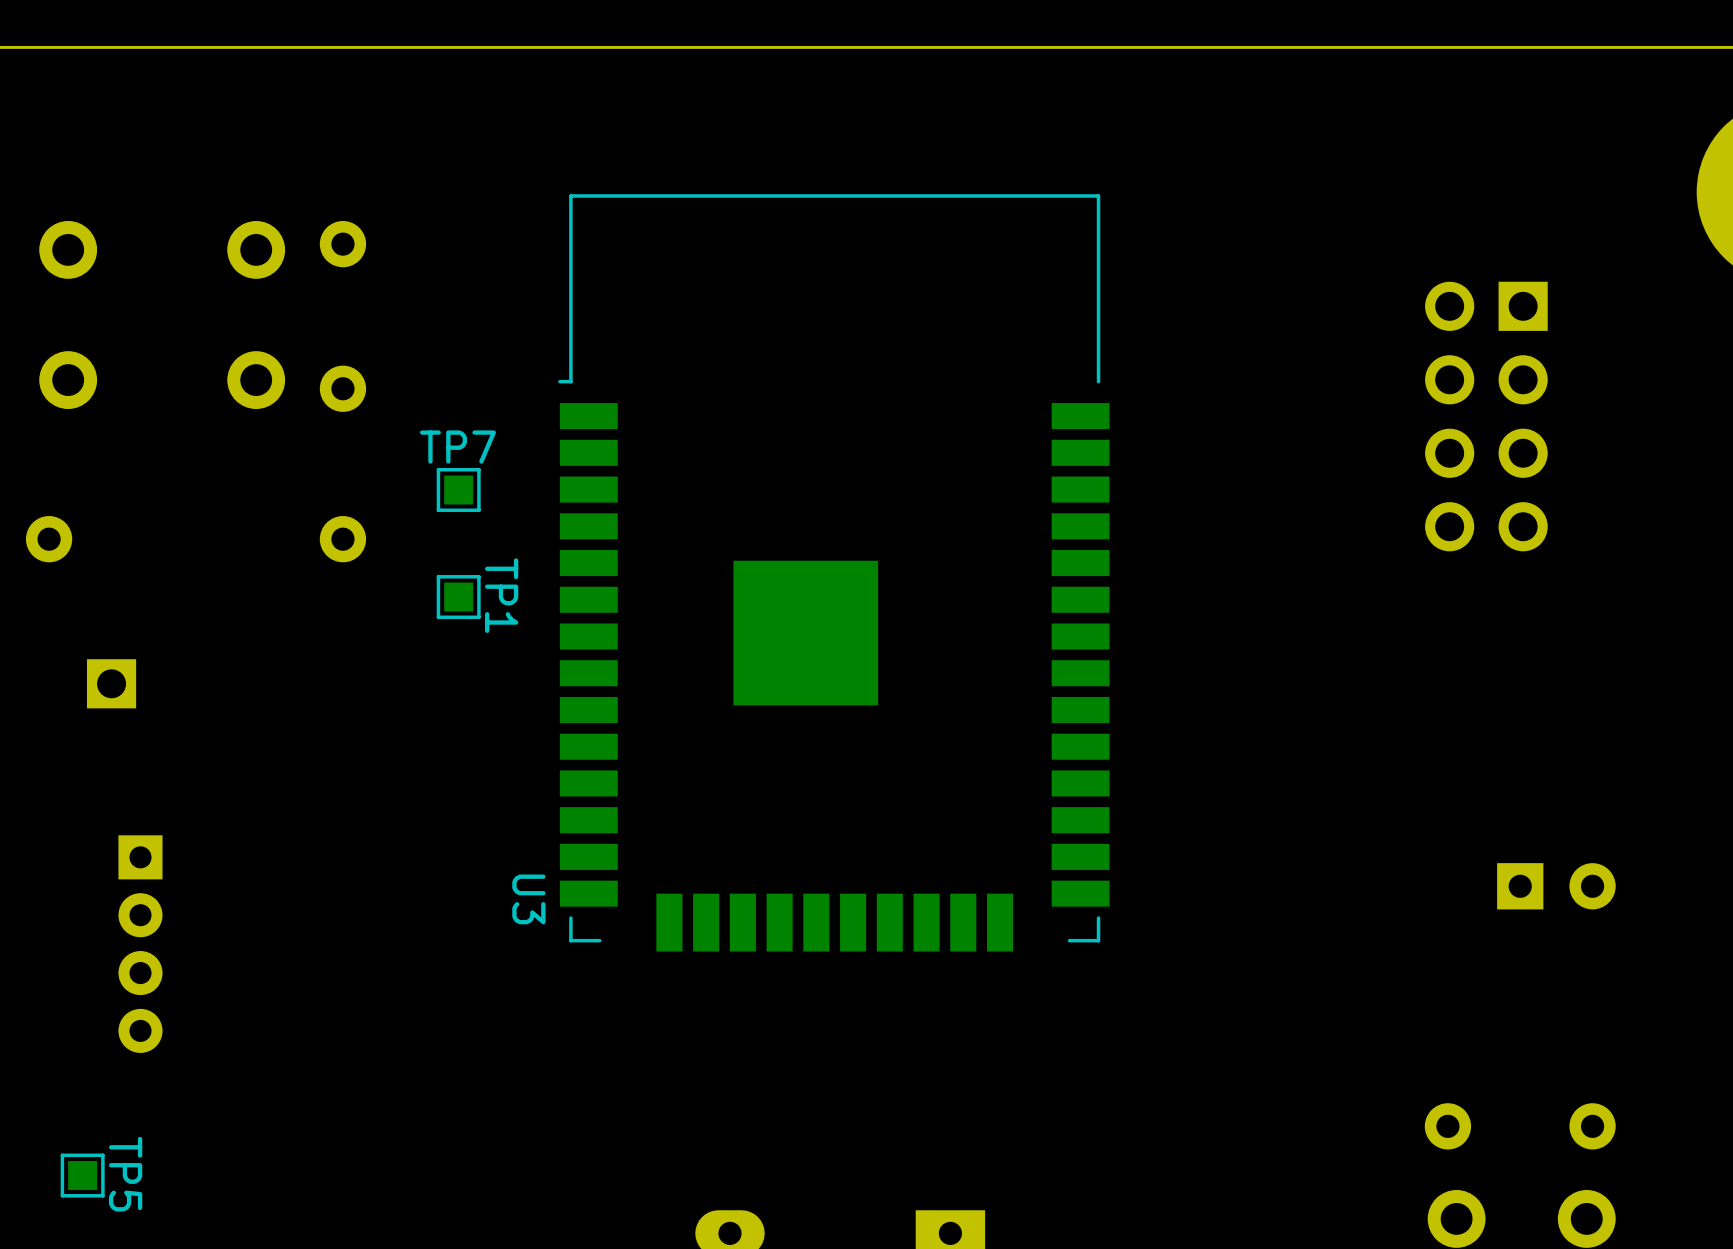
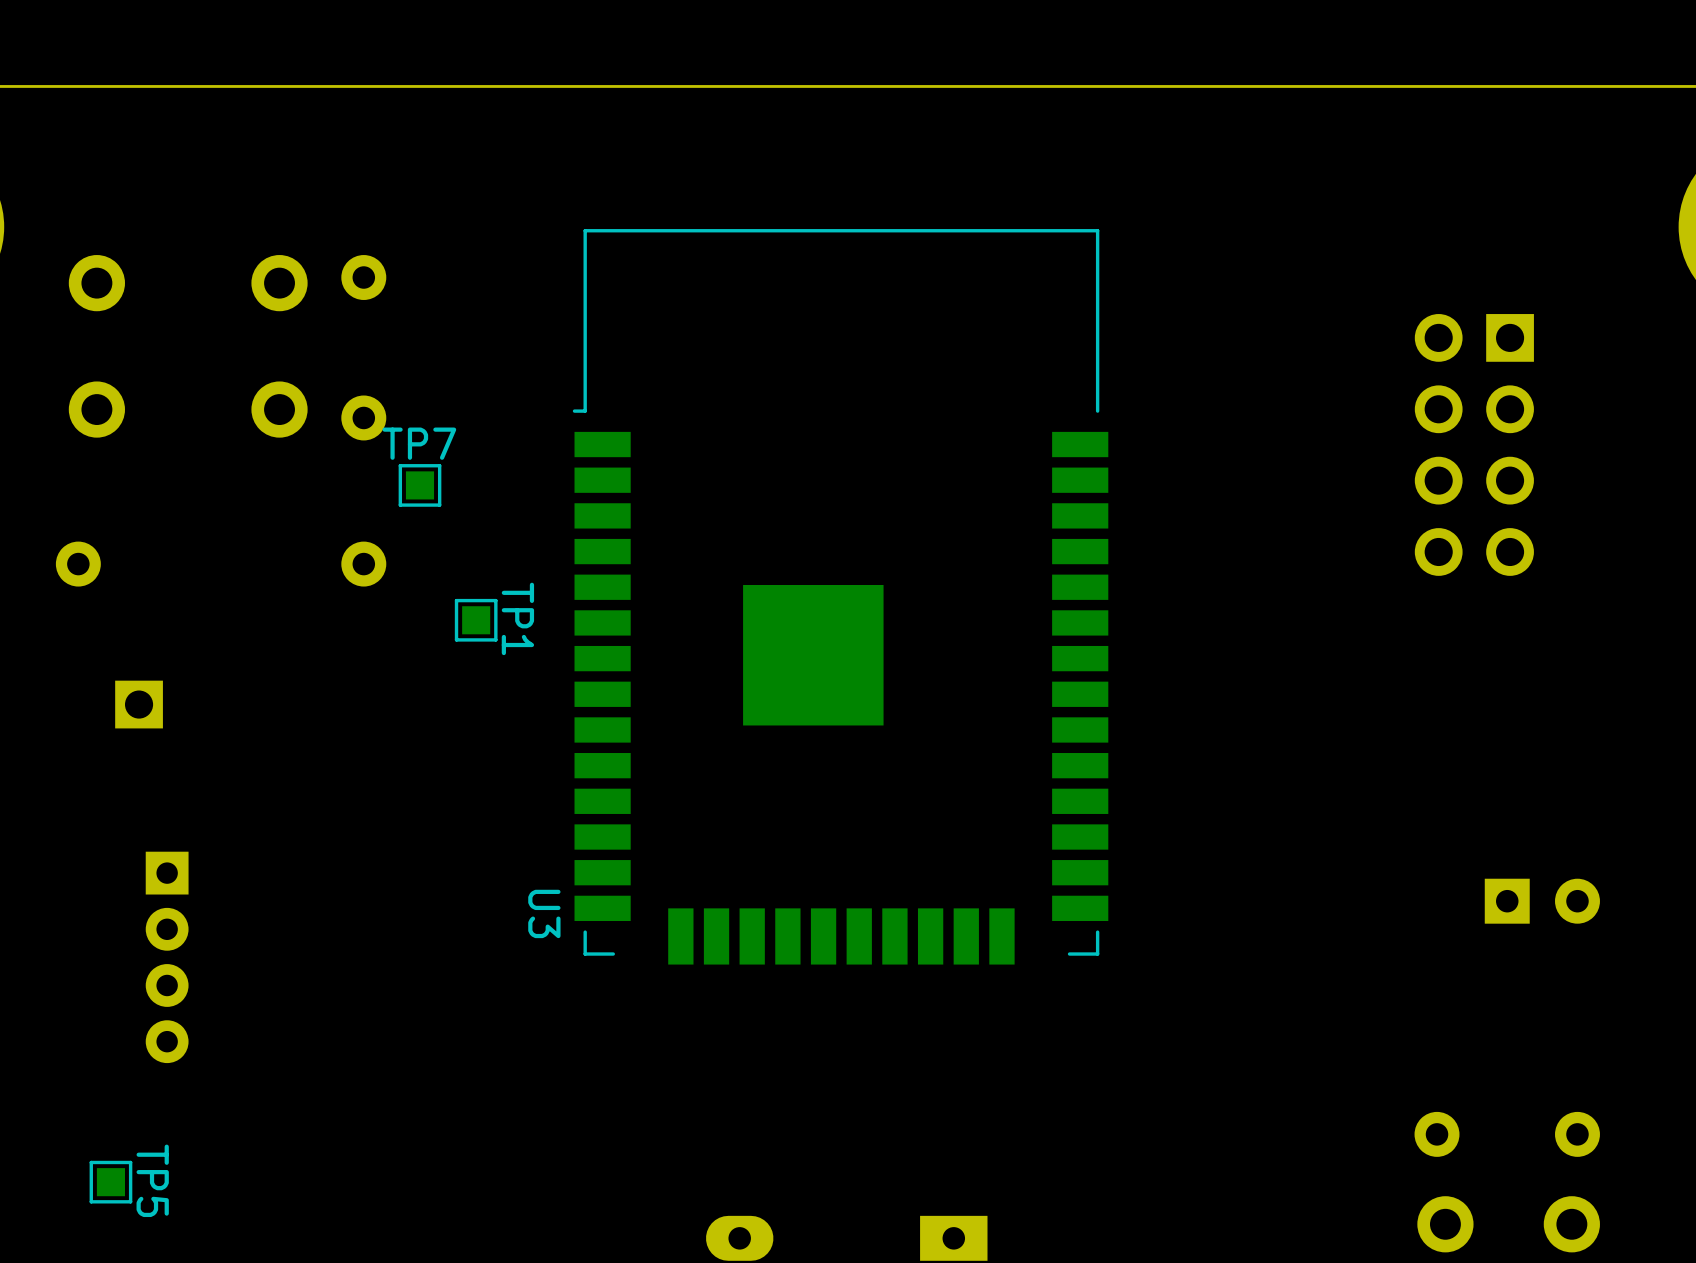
TP7 position: (458, 489) -> (419, 485)

